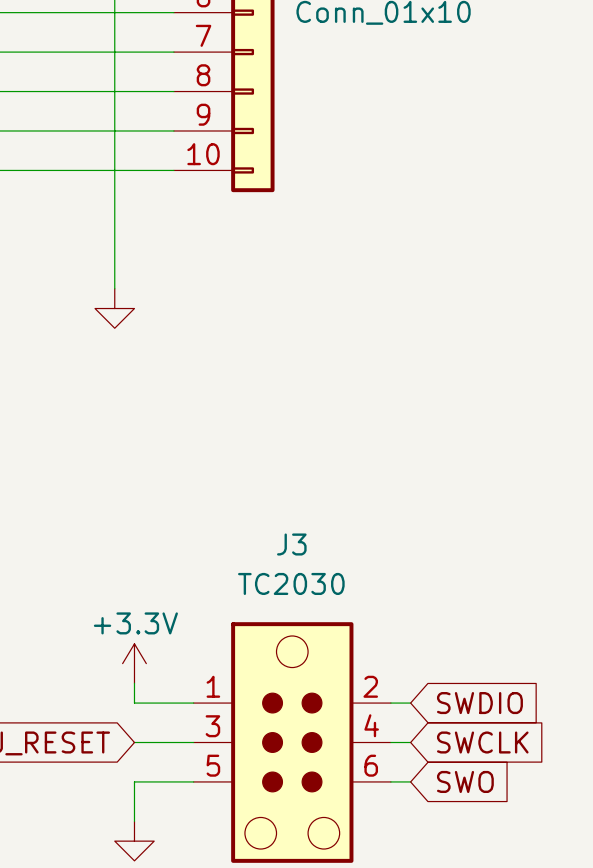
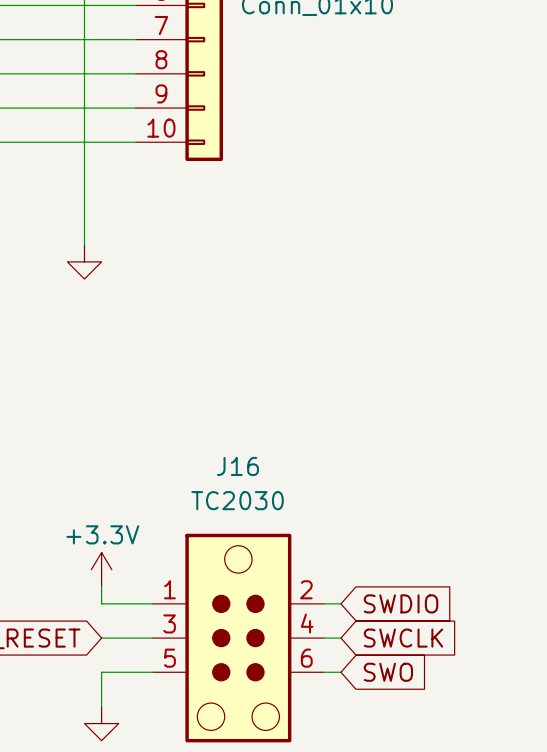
J3 name: J3 (291, 544) -> J16 (237, 466)

